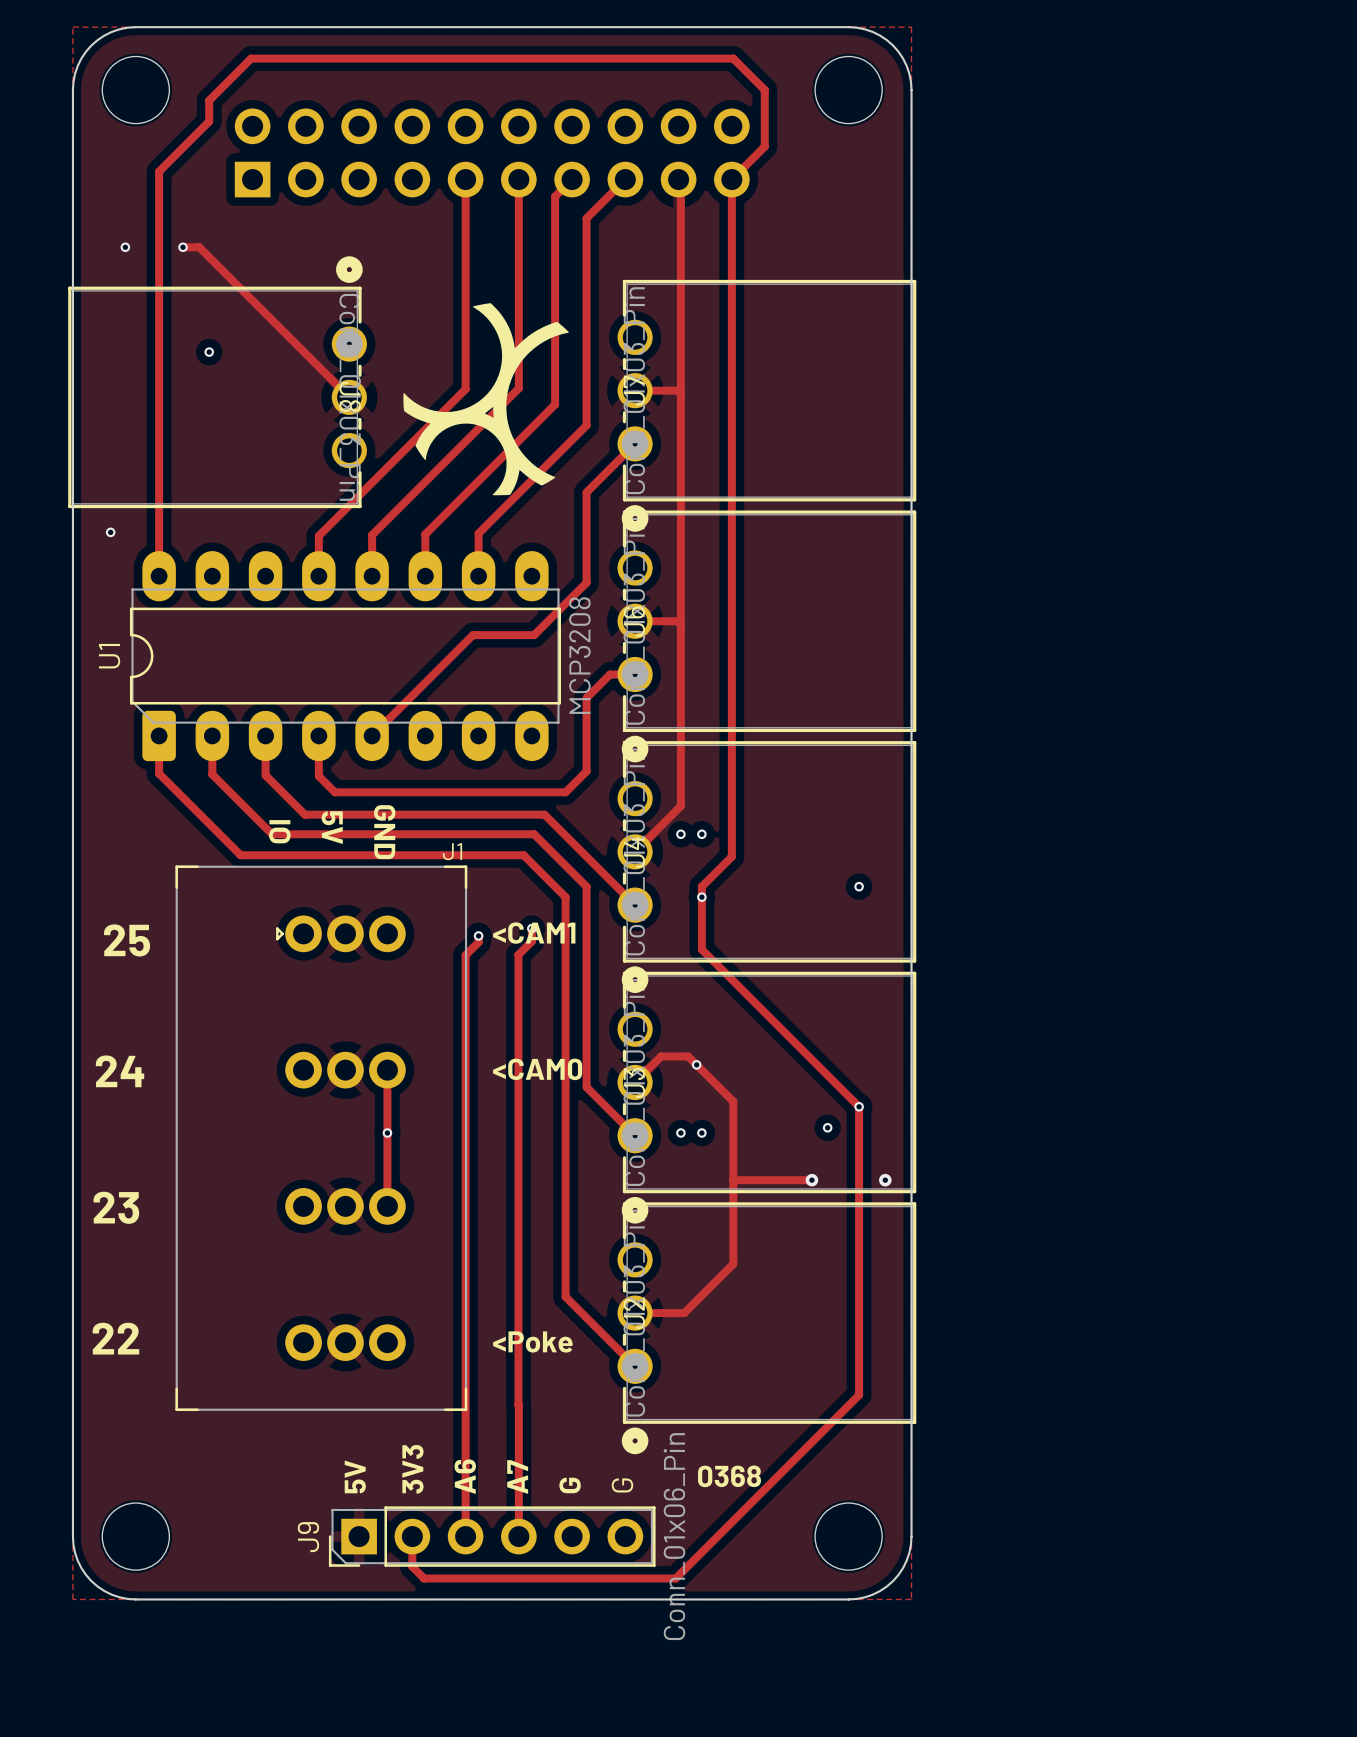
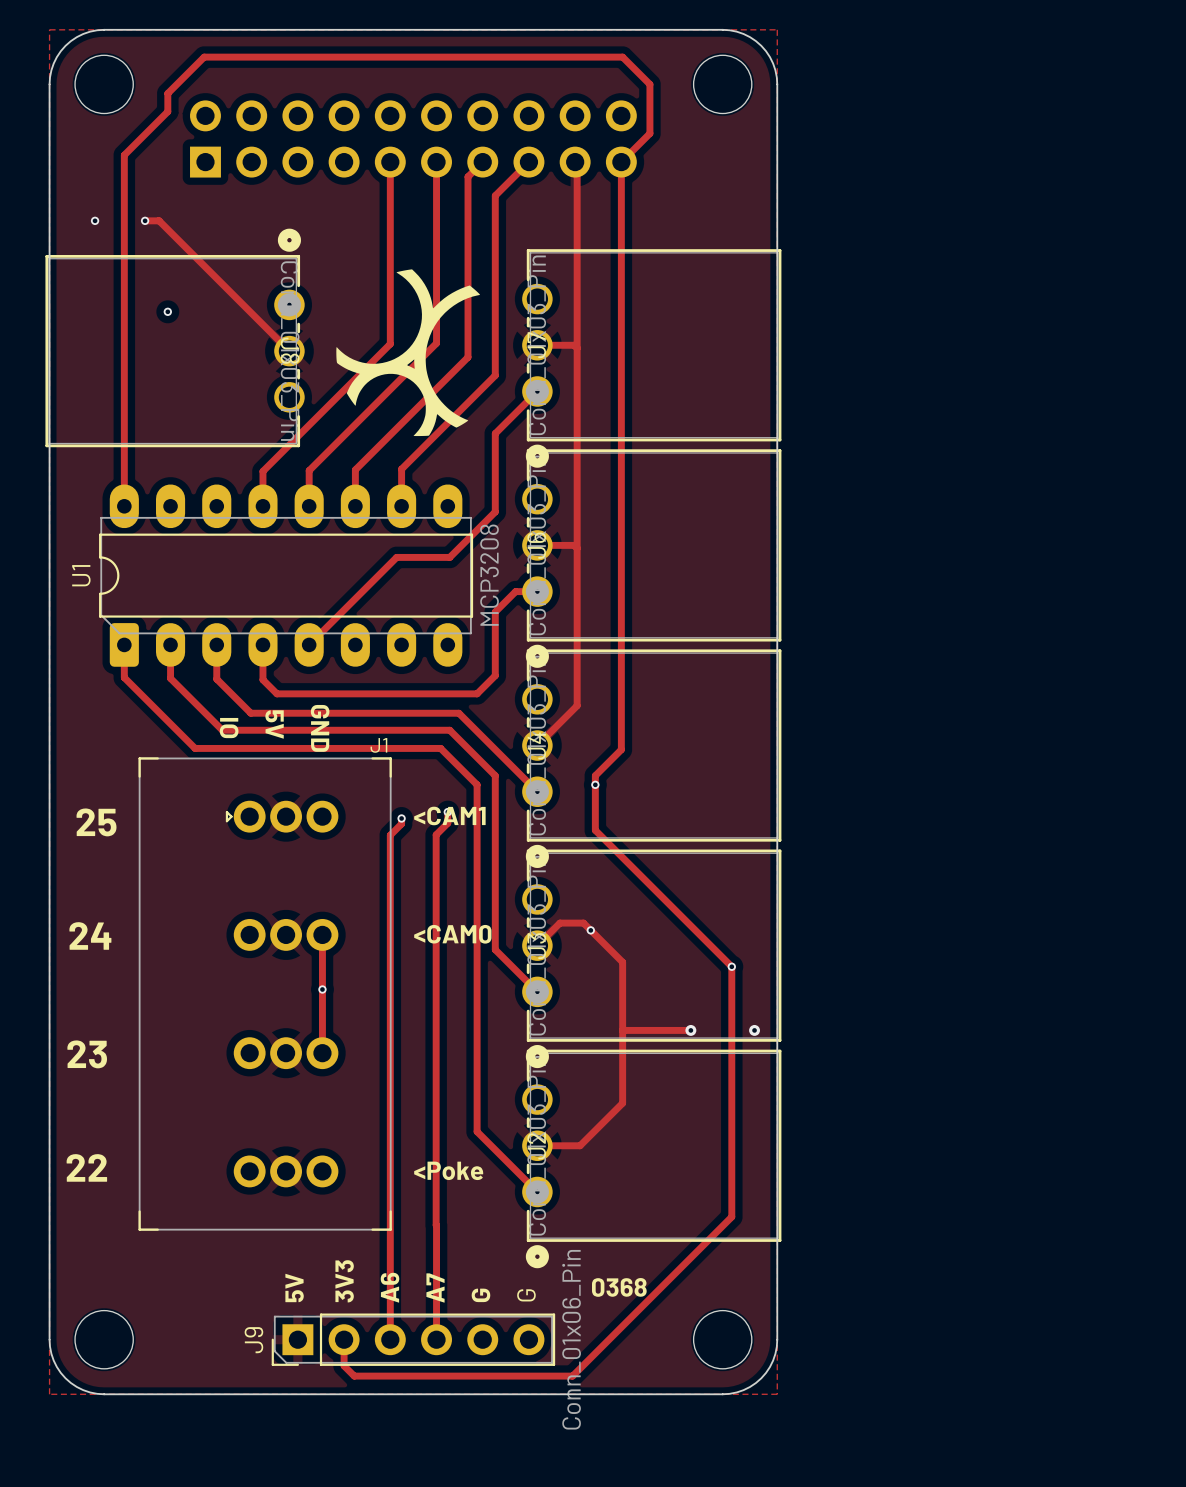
via: (110, 532) -> none
via: (680, 834) -> none
via: (701, 834) -> none
via: (859, 886) -> none
via: (827, 1127) -> none
via: (680, 1133) -> none
via: (701, 1133) -> none

